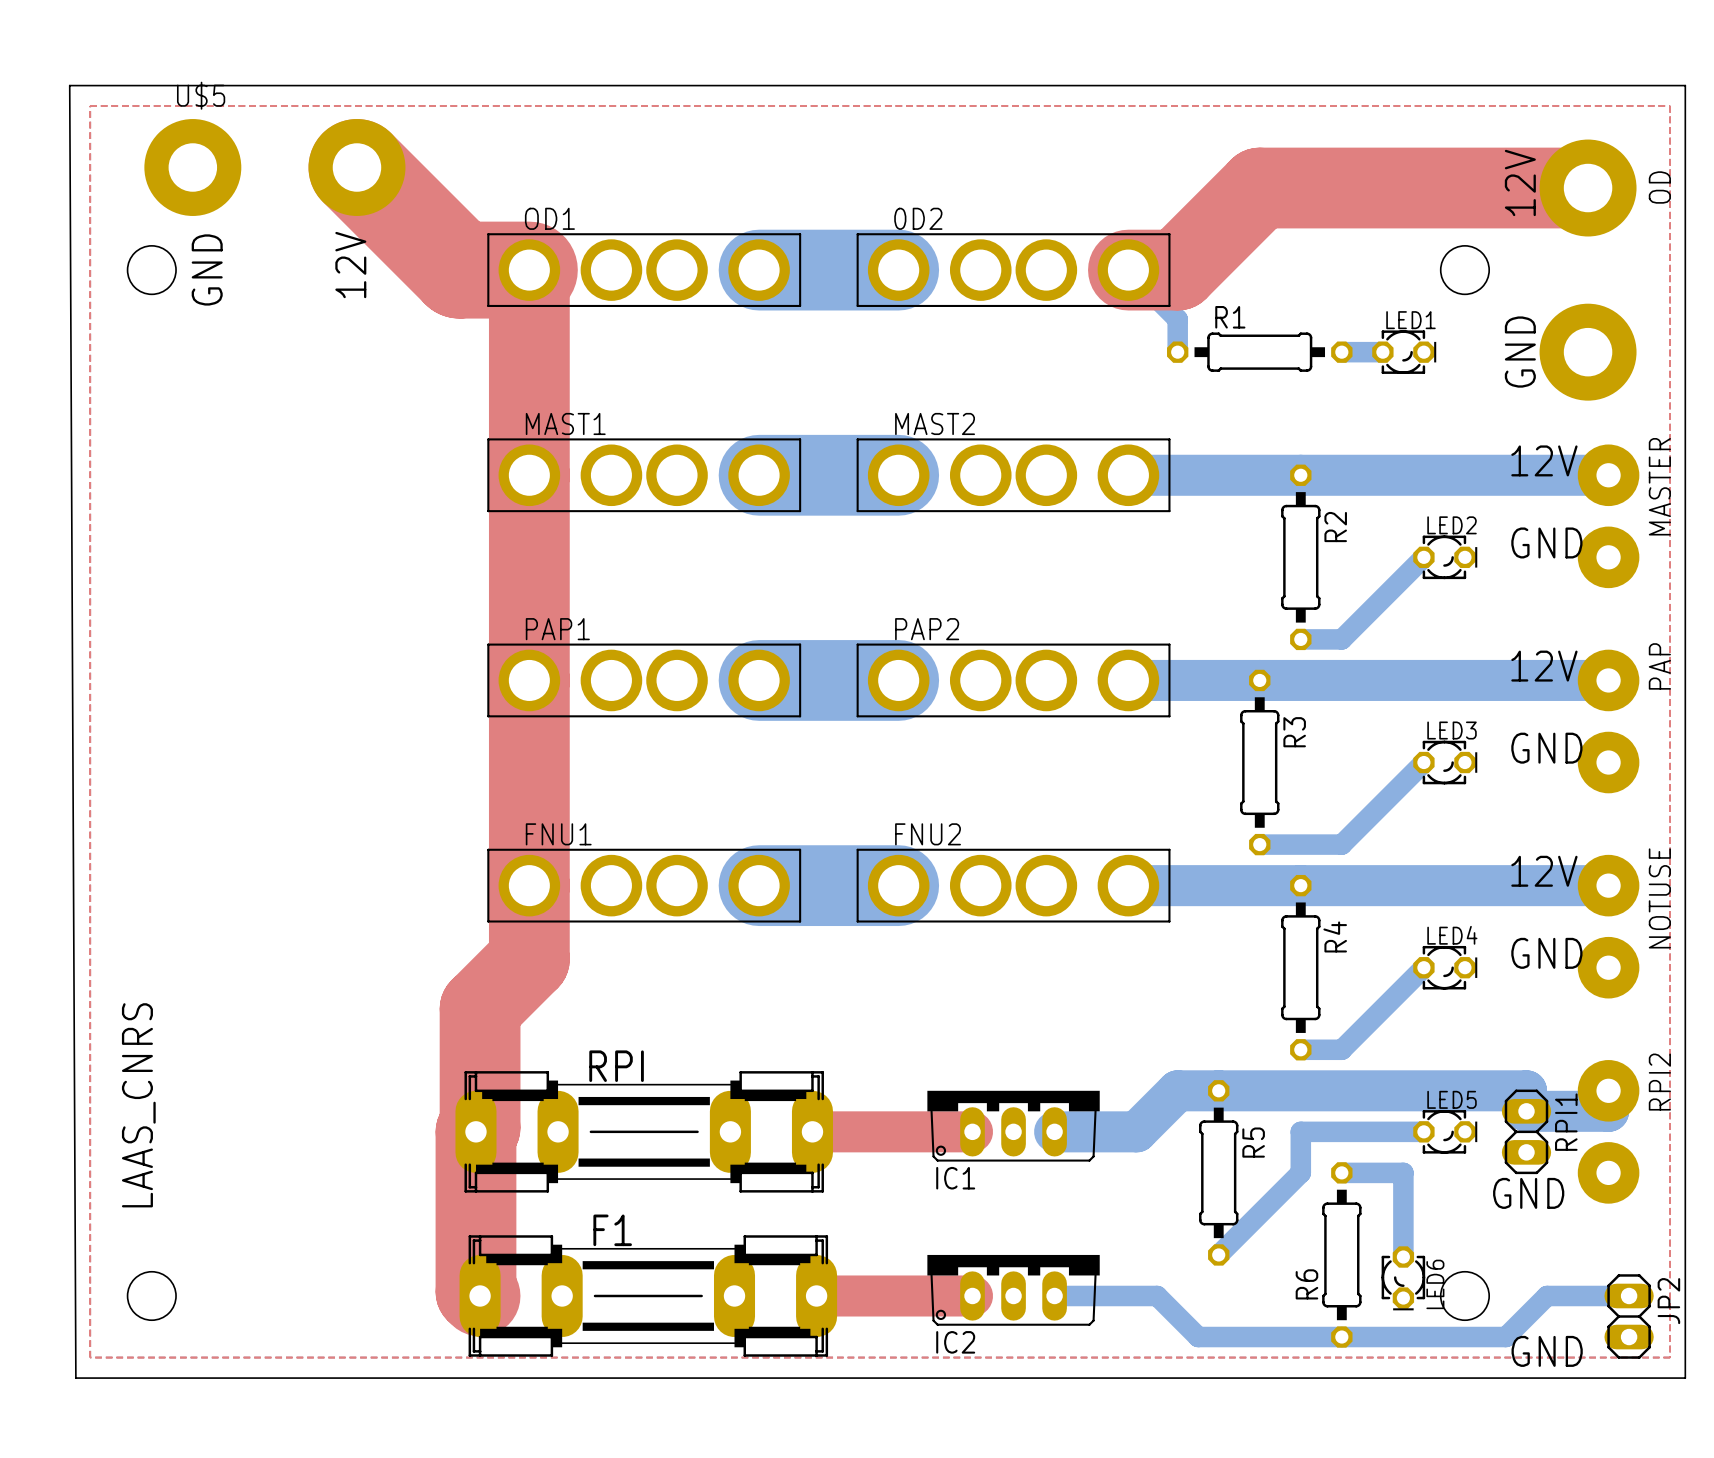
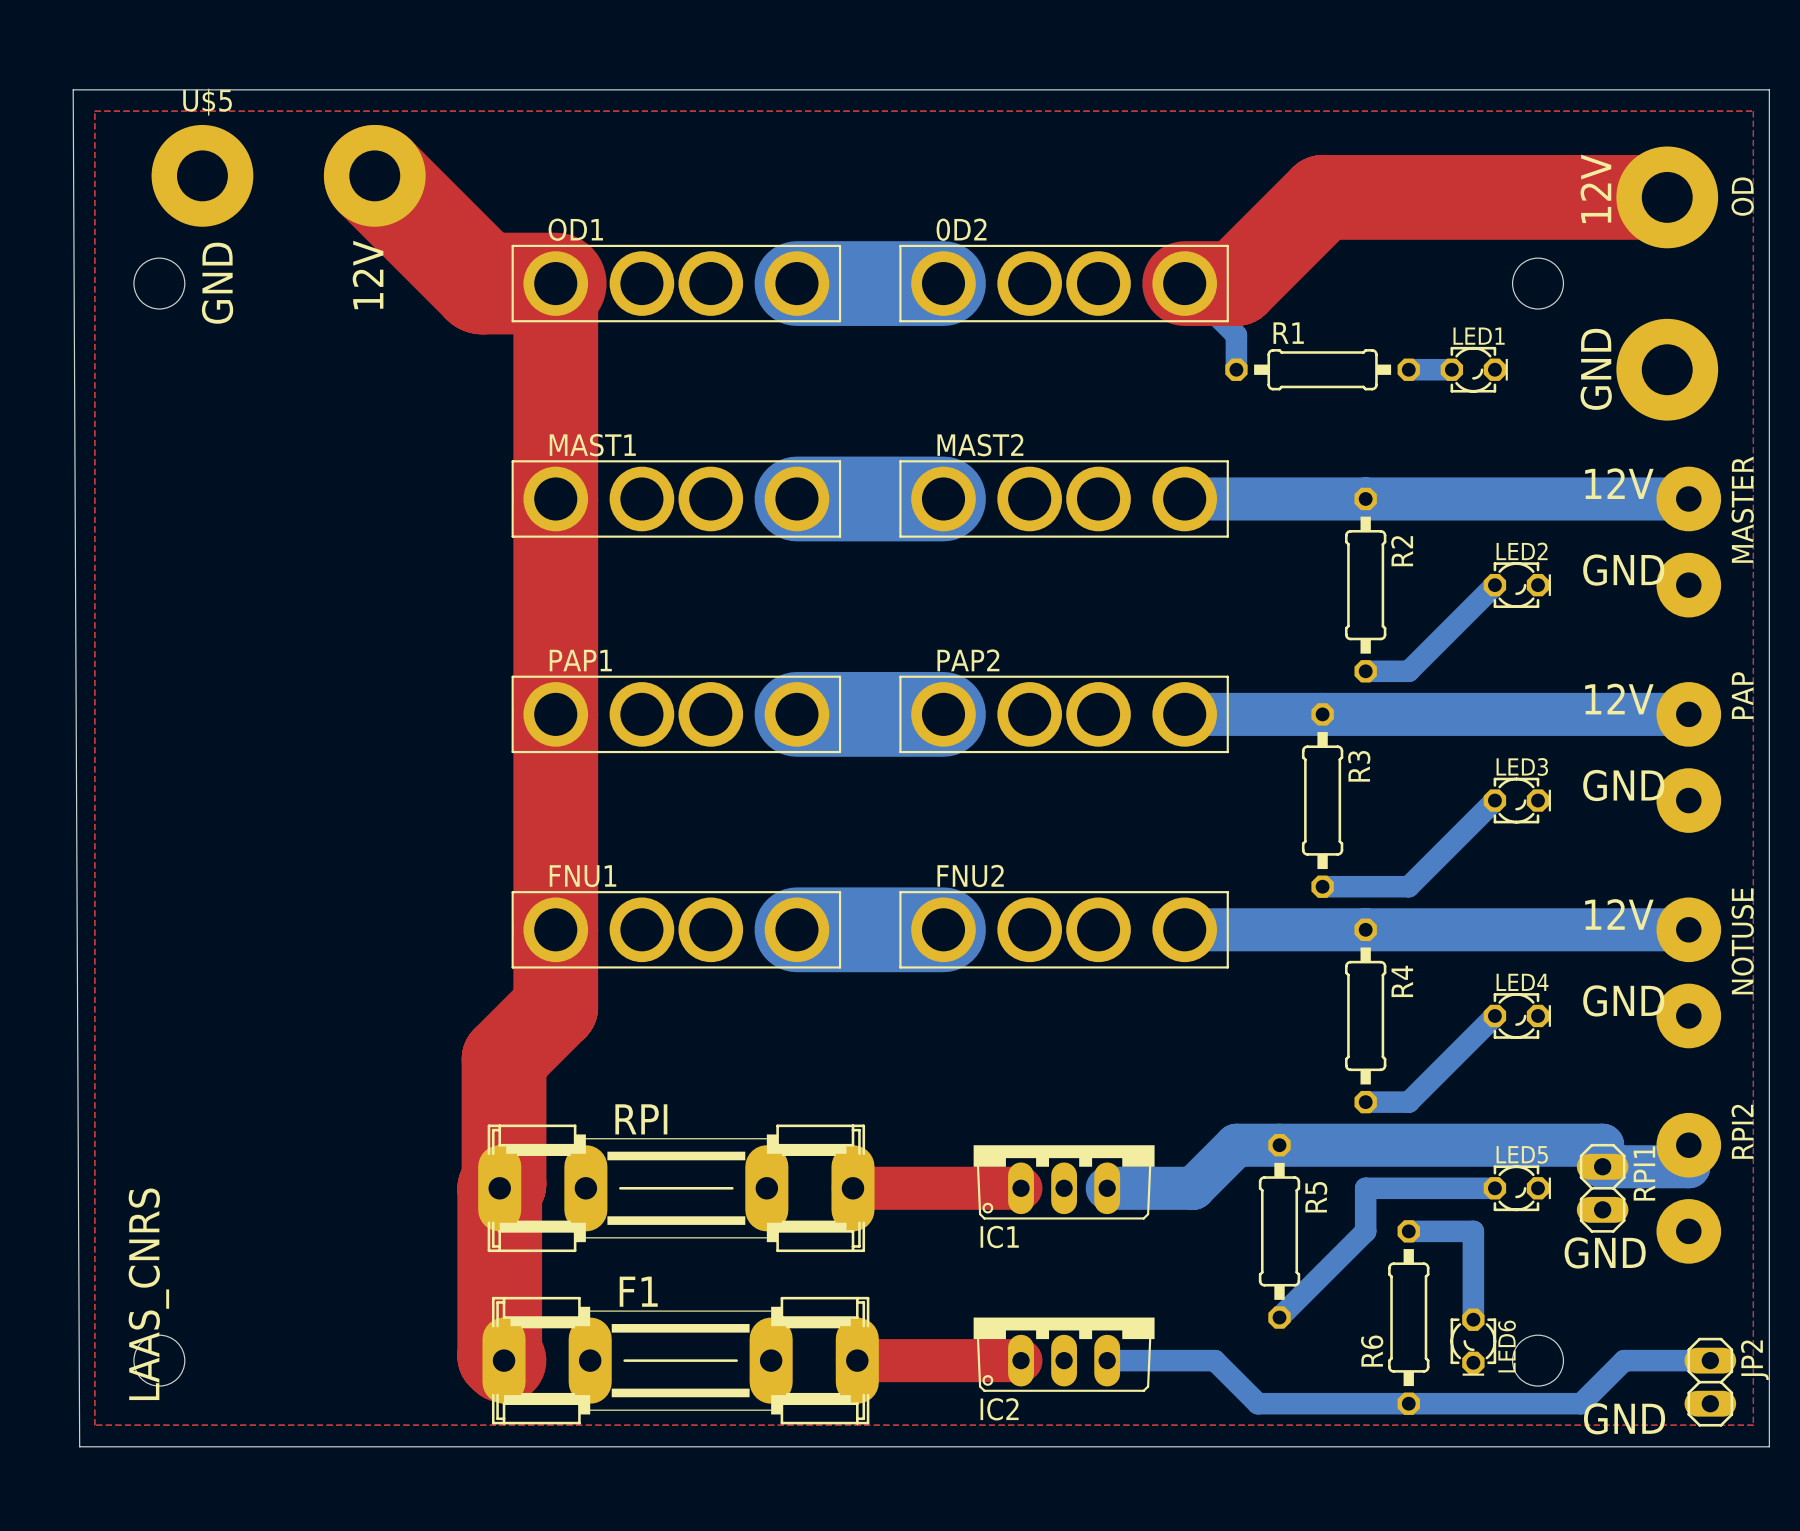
text position: LAAS_CNRS (138, 1105) -> LAAS_CNRS (148, 1294)

